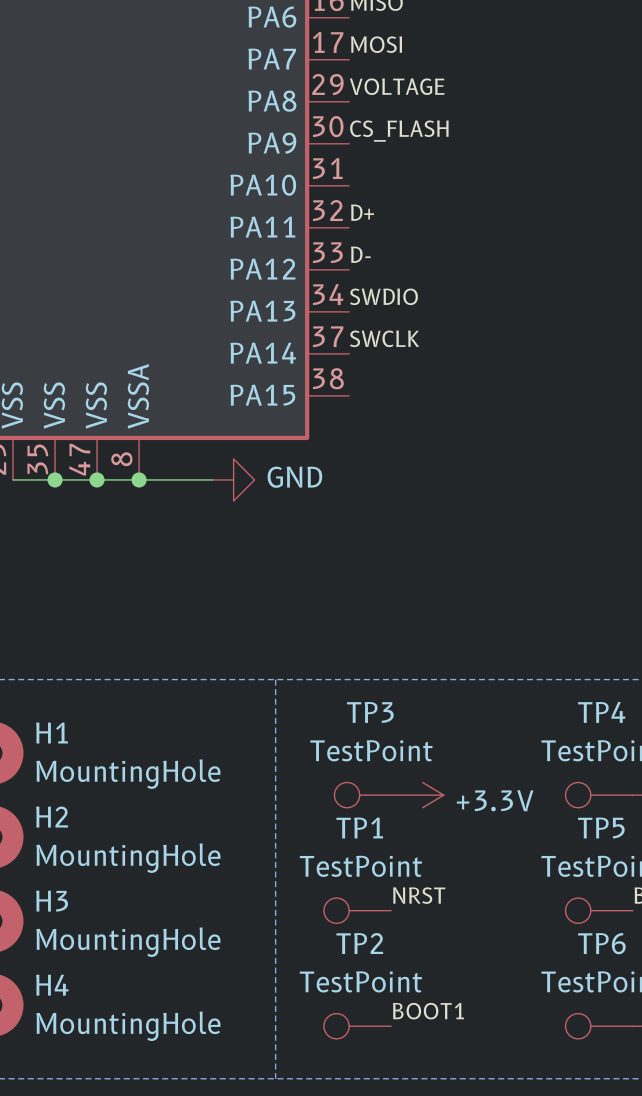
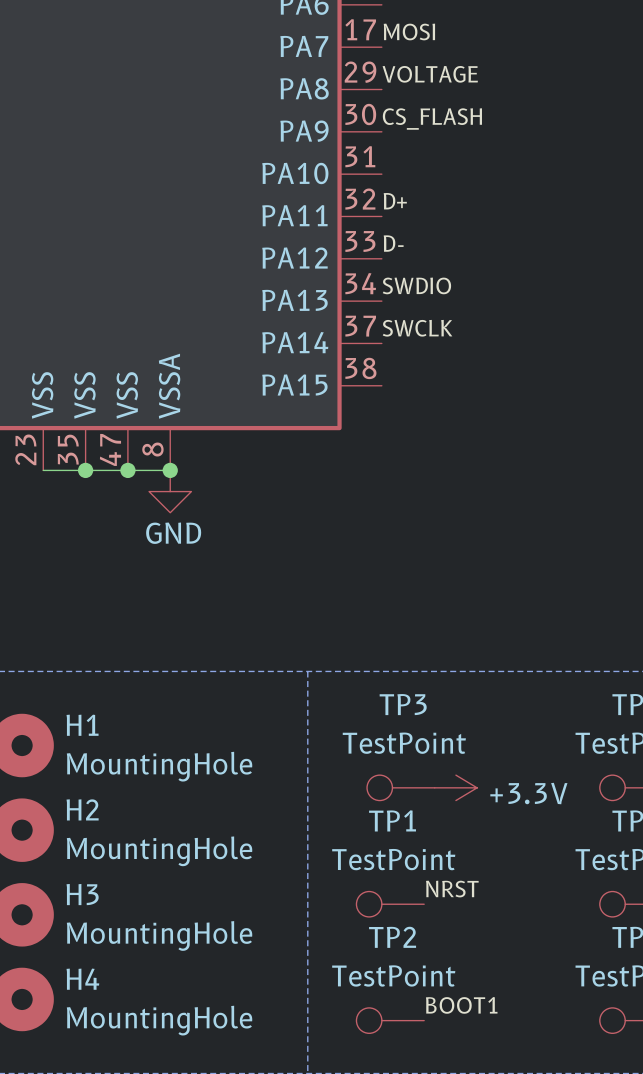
wire: (139, 479) (212, 479) -> none
power symbol rotation: 0° (233, 479) -> 90° clockwise (170, 491)
power symbol position: GND (233, 479) -> GND (170, 491)

